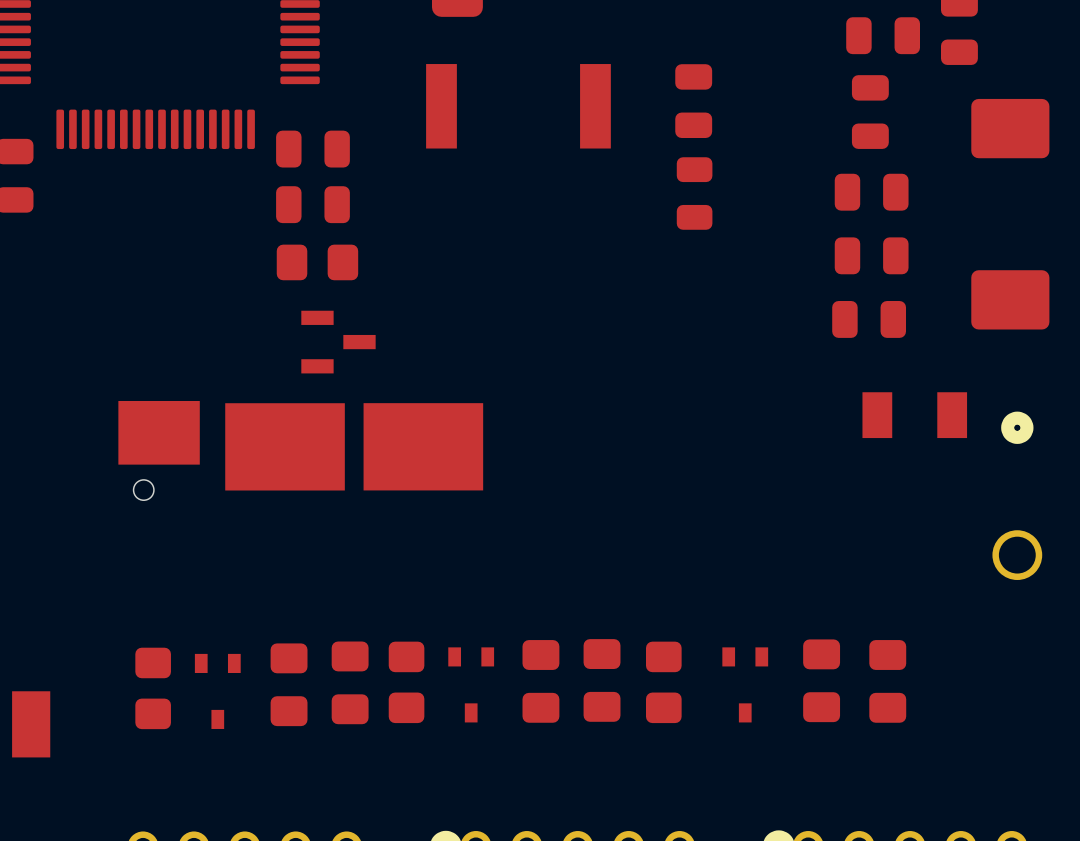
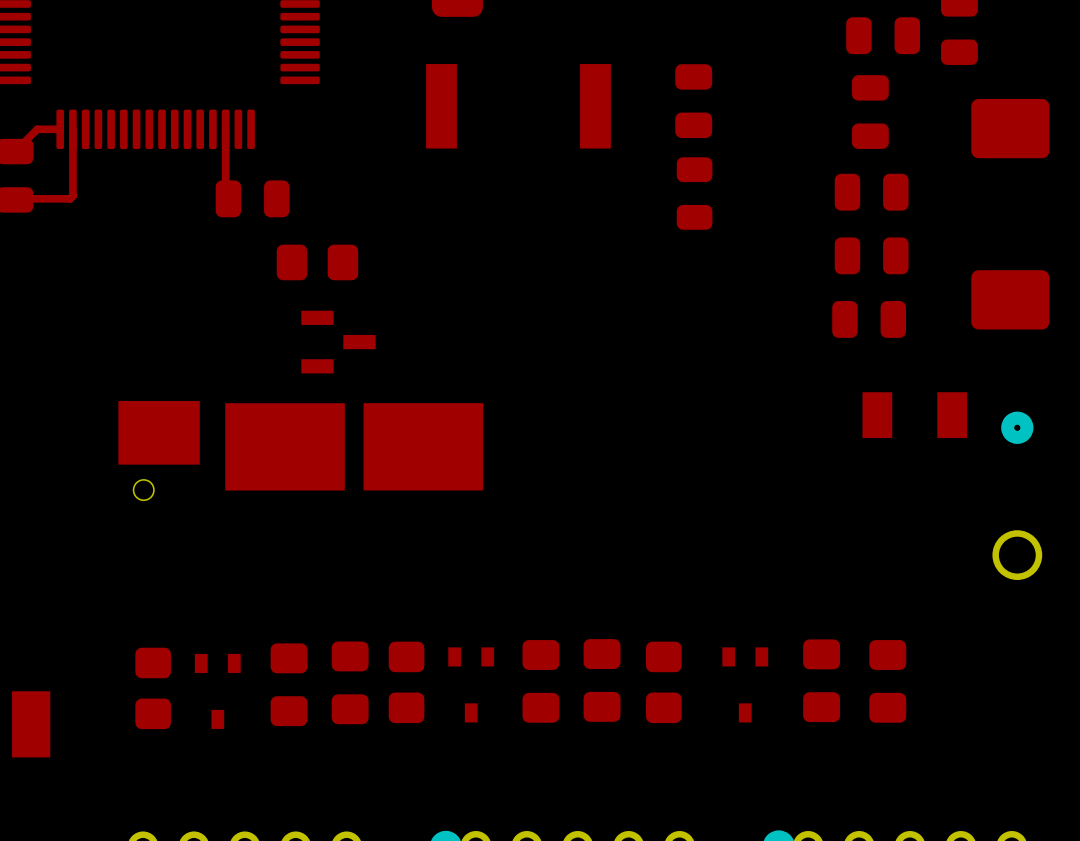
top track: none -> (60, 129) (37, 129) (15, 151)
top track: none -> (72, 129) (72, 196) (70, 198) (15, 199)
top track: none -> (225, 129) (225, 196) (228, 198)
part: (312, 149) -> none
part: none -> (252, 198)
part: (312, 204) -> none

